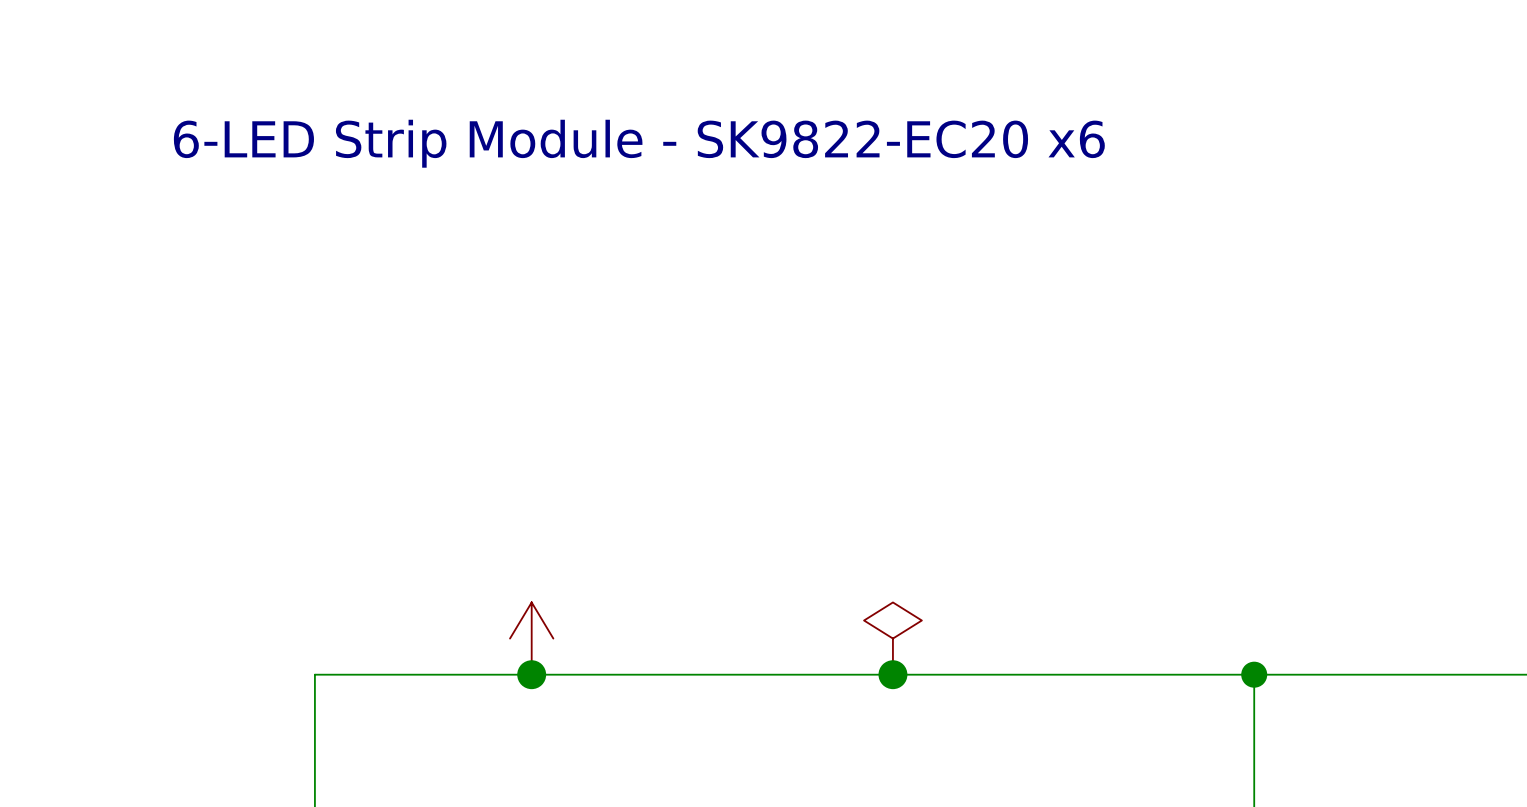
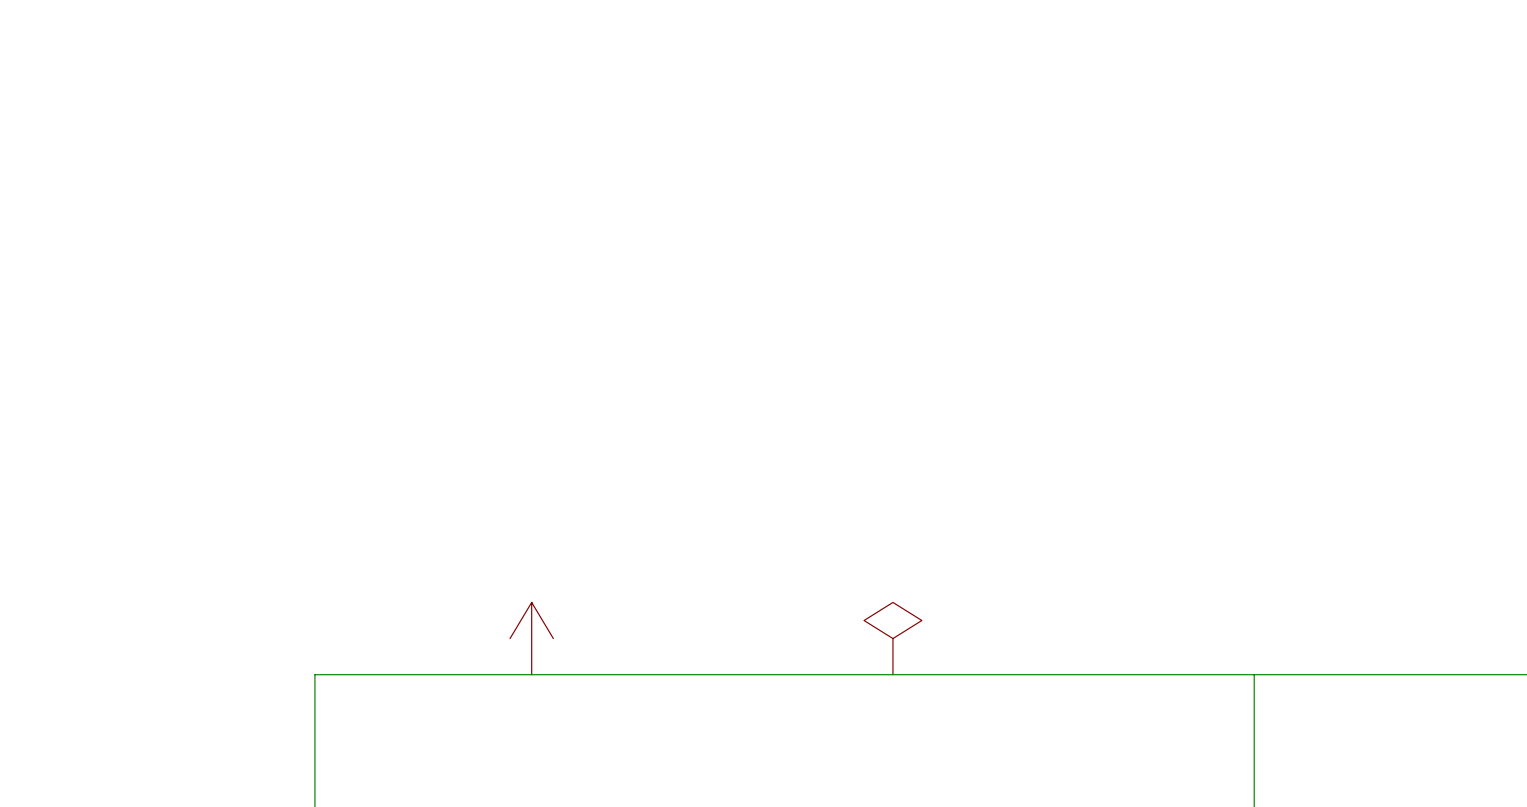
text: 6-LED Strip Module - SK9822-EC20 x6 (639, 143) -> none
junction: (531, 674) -> none
junction: (892, 674) -> none
junction: (1254, 674) -> none

